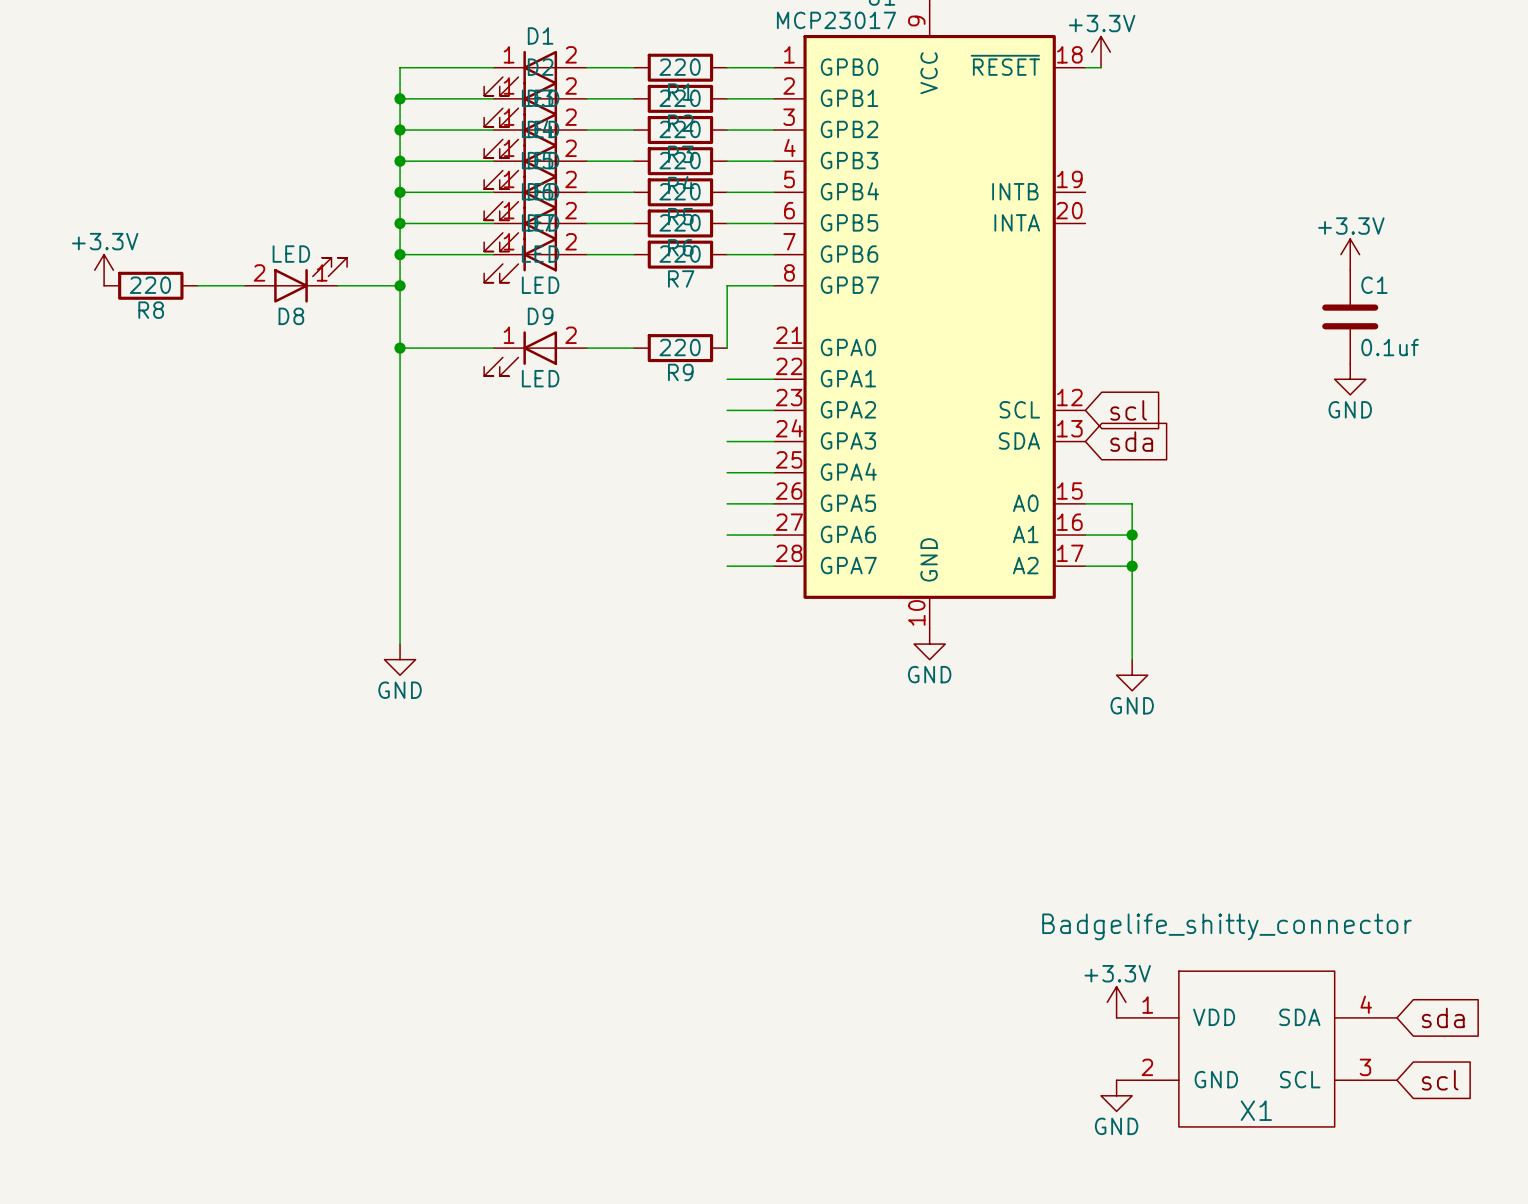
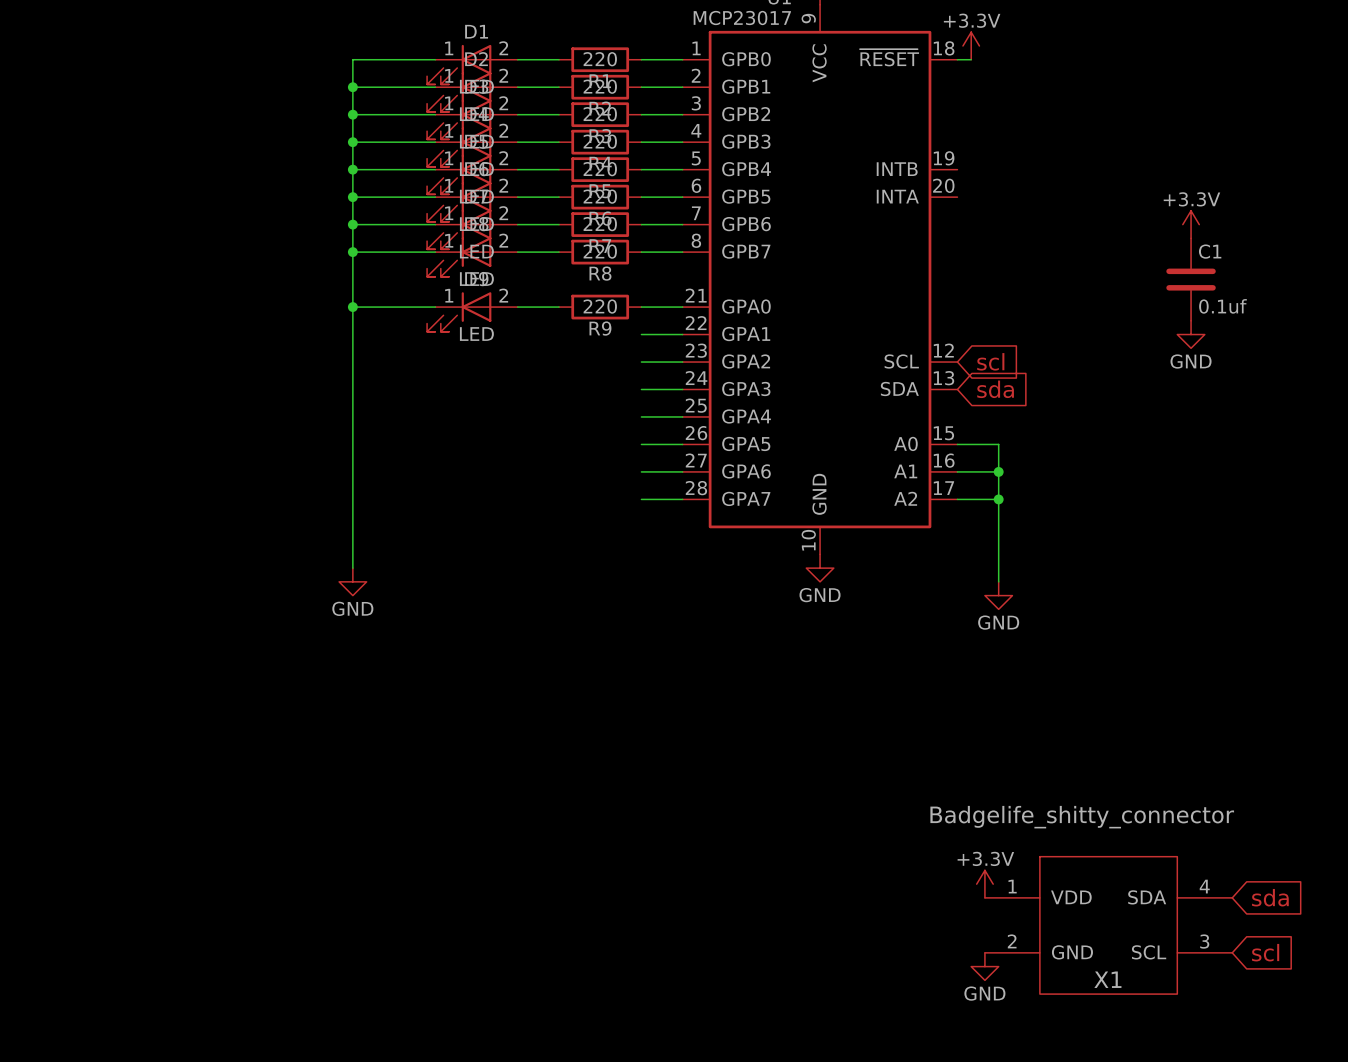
power symbol: +3.3V (104, 270) -> none
D8 position: (295, 280) -> (472, 257)
D8 rotation: 0° (310, 280) -> 180° (459, 257)
R8 position: (150, 285) -> (600, 252)
wire: (197, 285) (244, 285) -> none
wire: (337, 285) (400, 285) -> (435, 252) (352, 252)
wire: none -> (517, 252) (558, 252)
wire: (727, 285) (727, 348) -> (682, 307) (641, 307)

